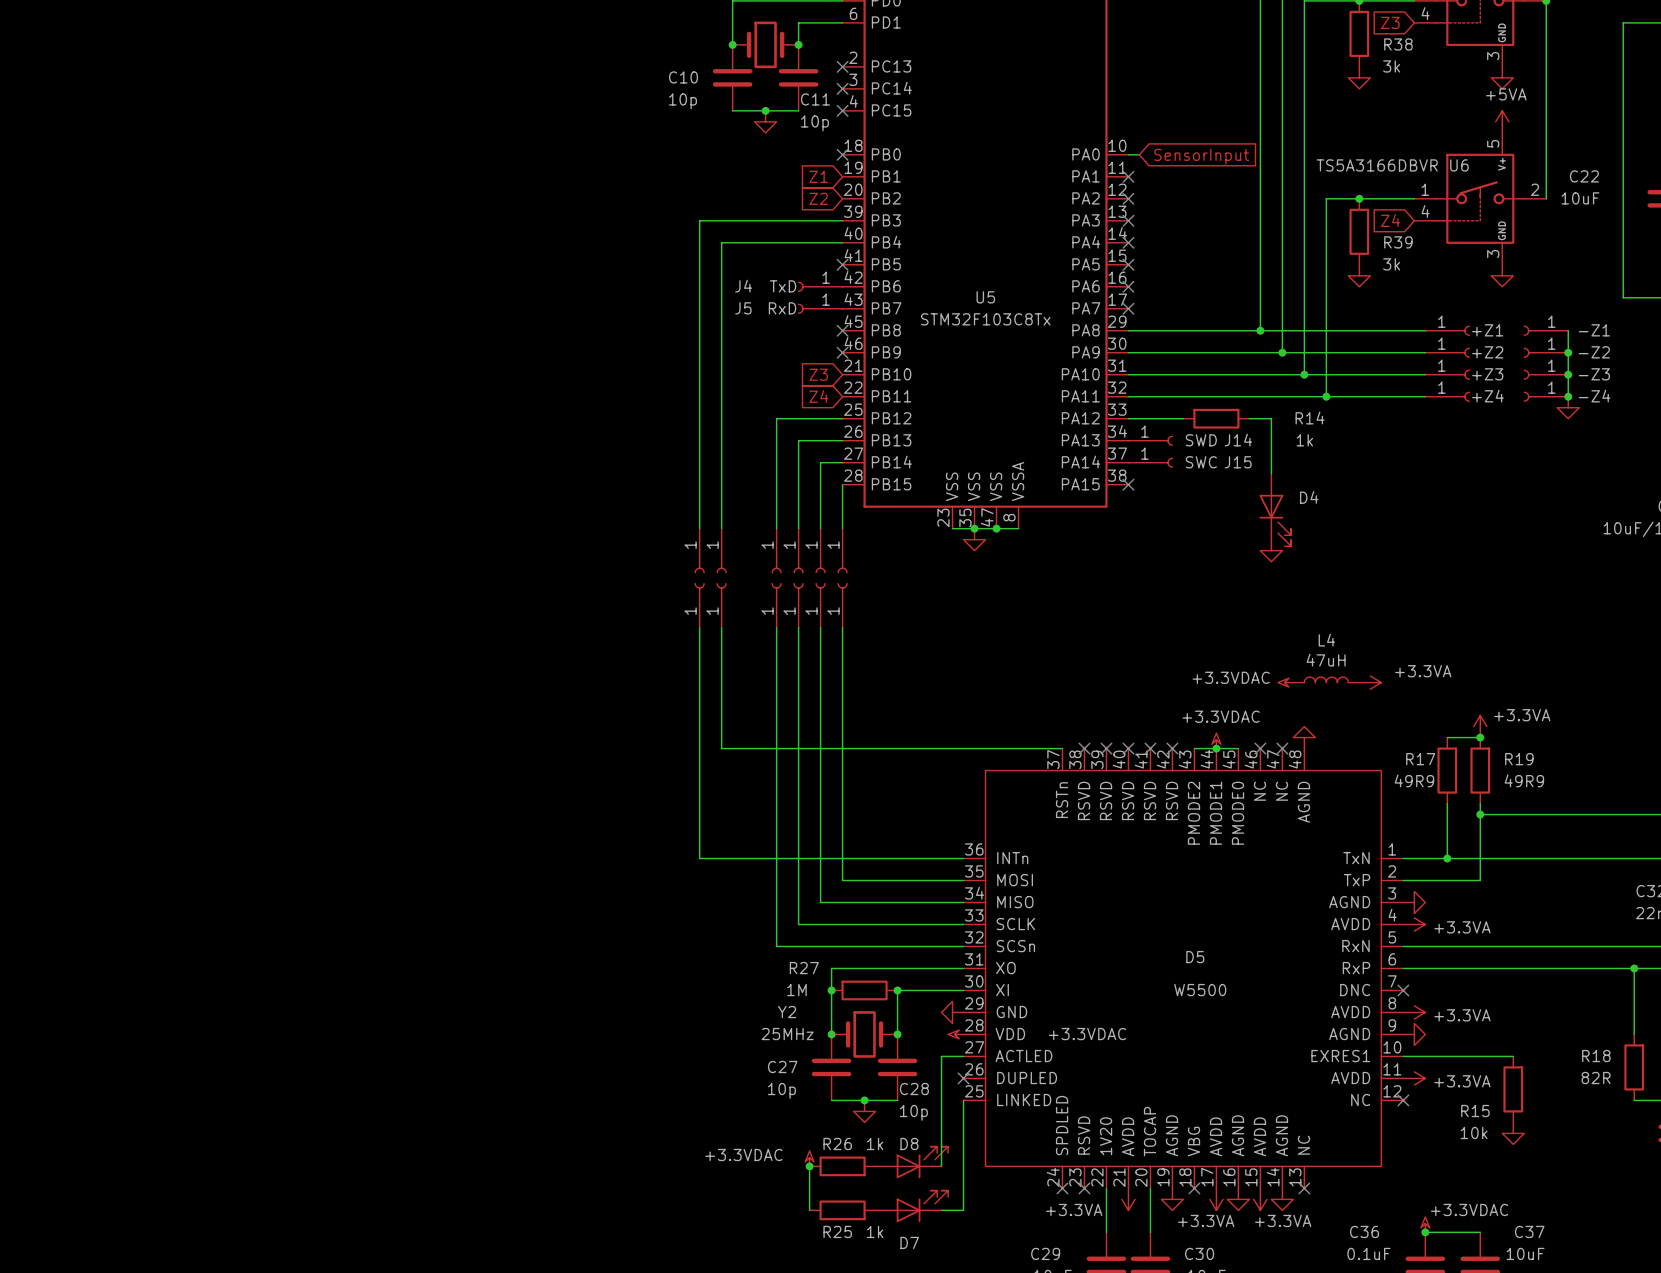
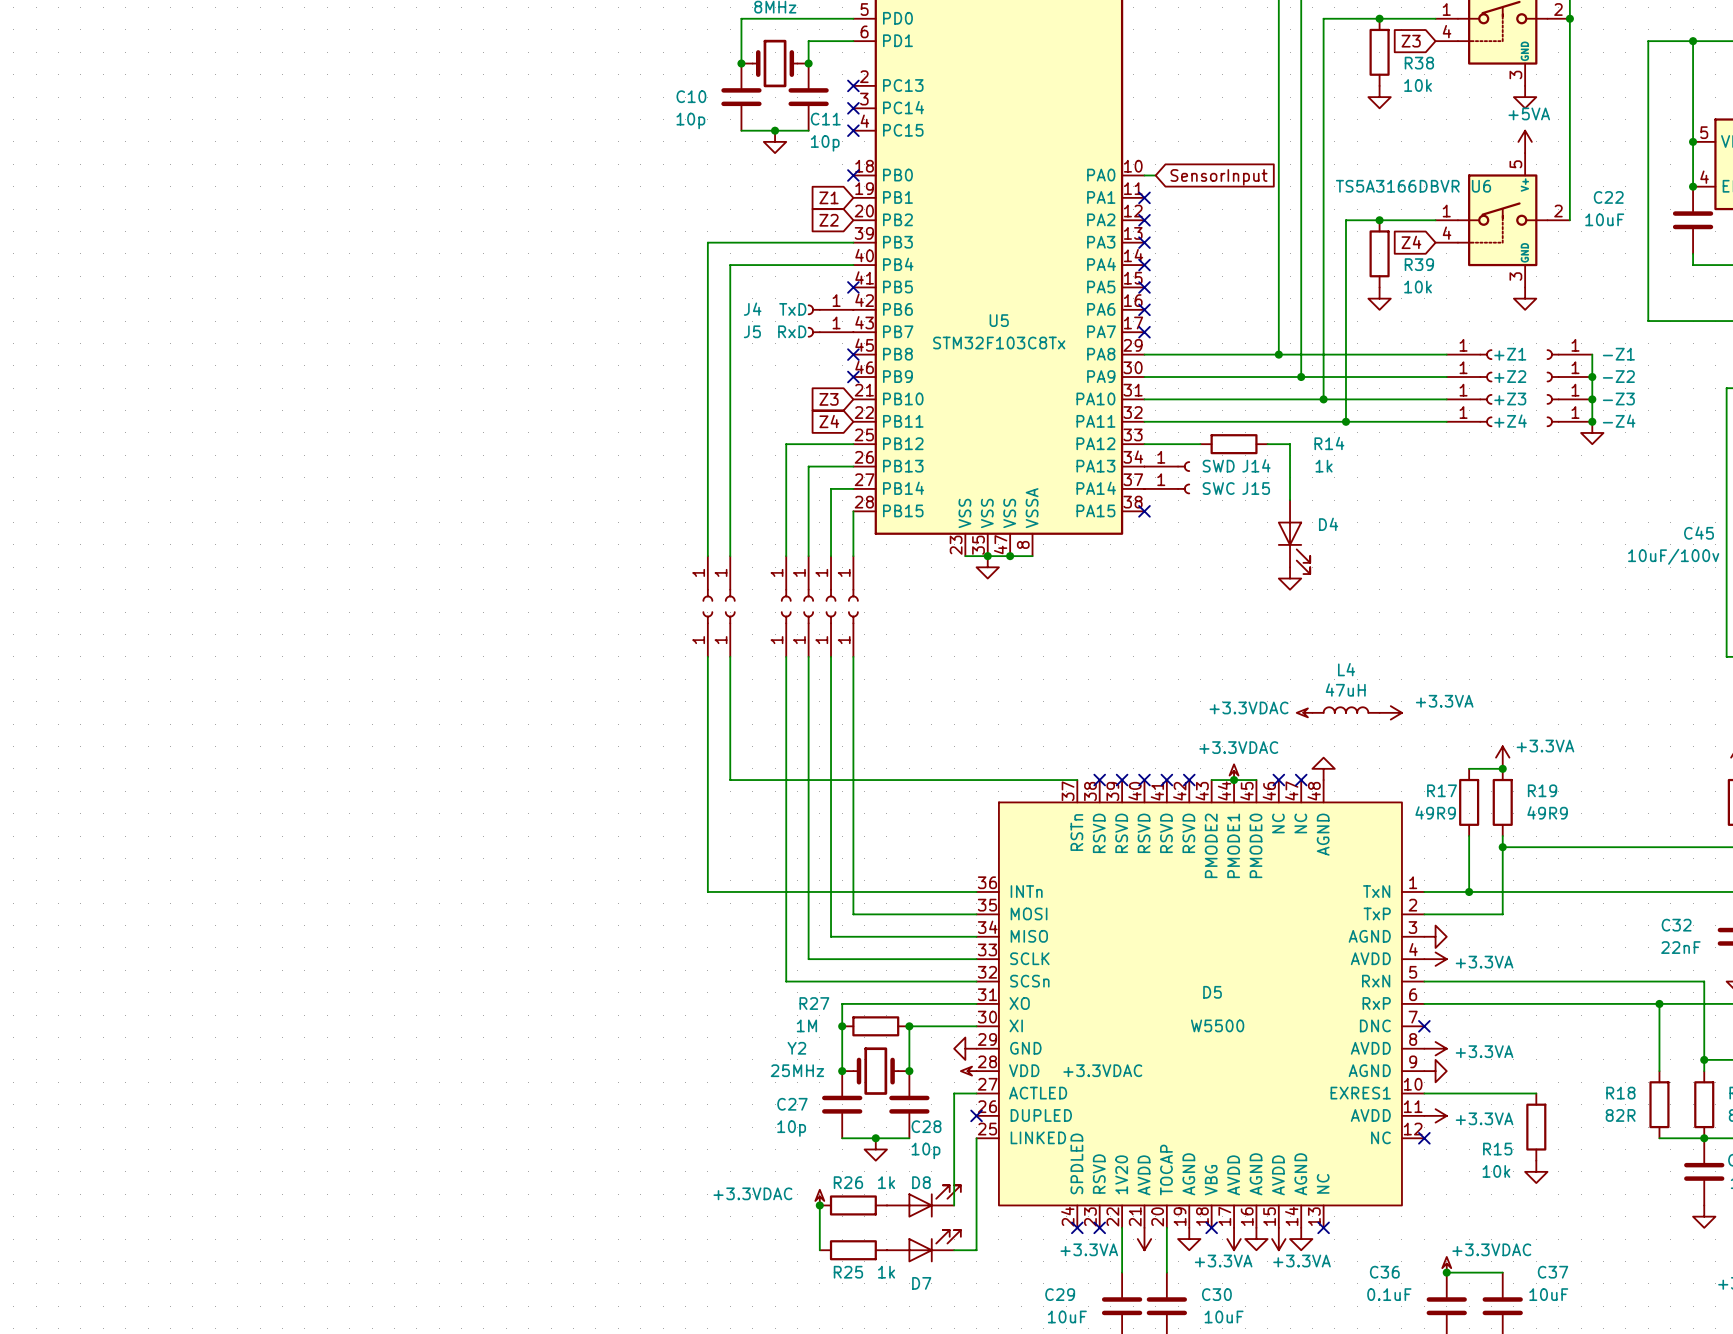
R38 value: 3k (1391, 66) -> 10k (1418, 85)
R39 value: 3k (1391, 264) -> 10k (1418, 287)

